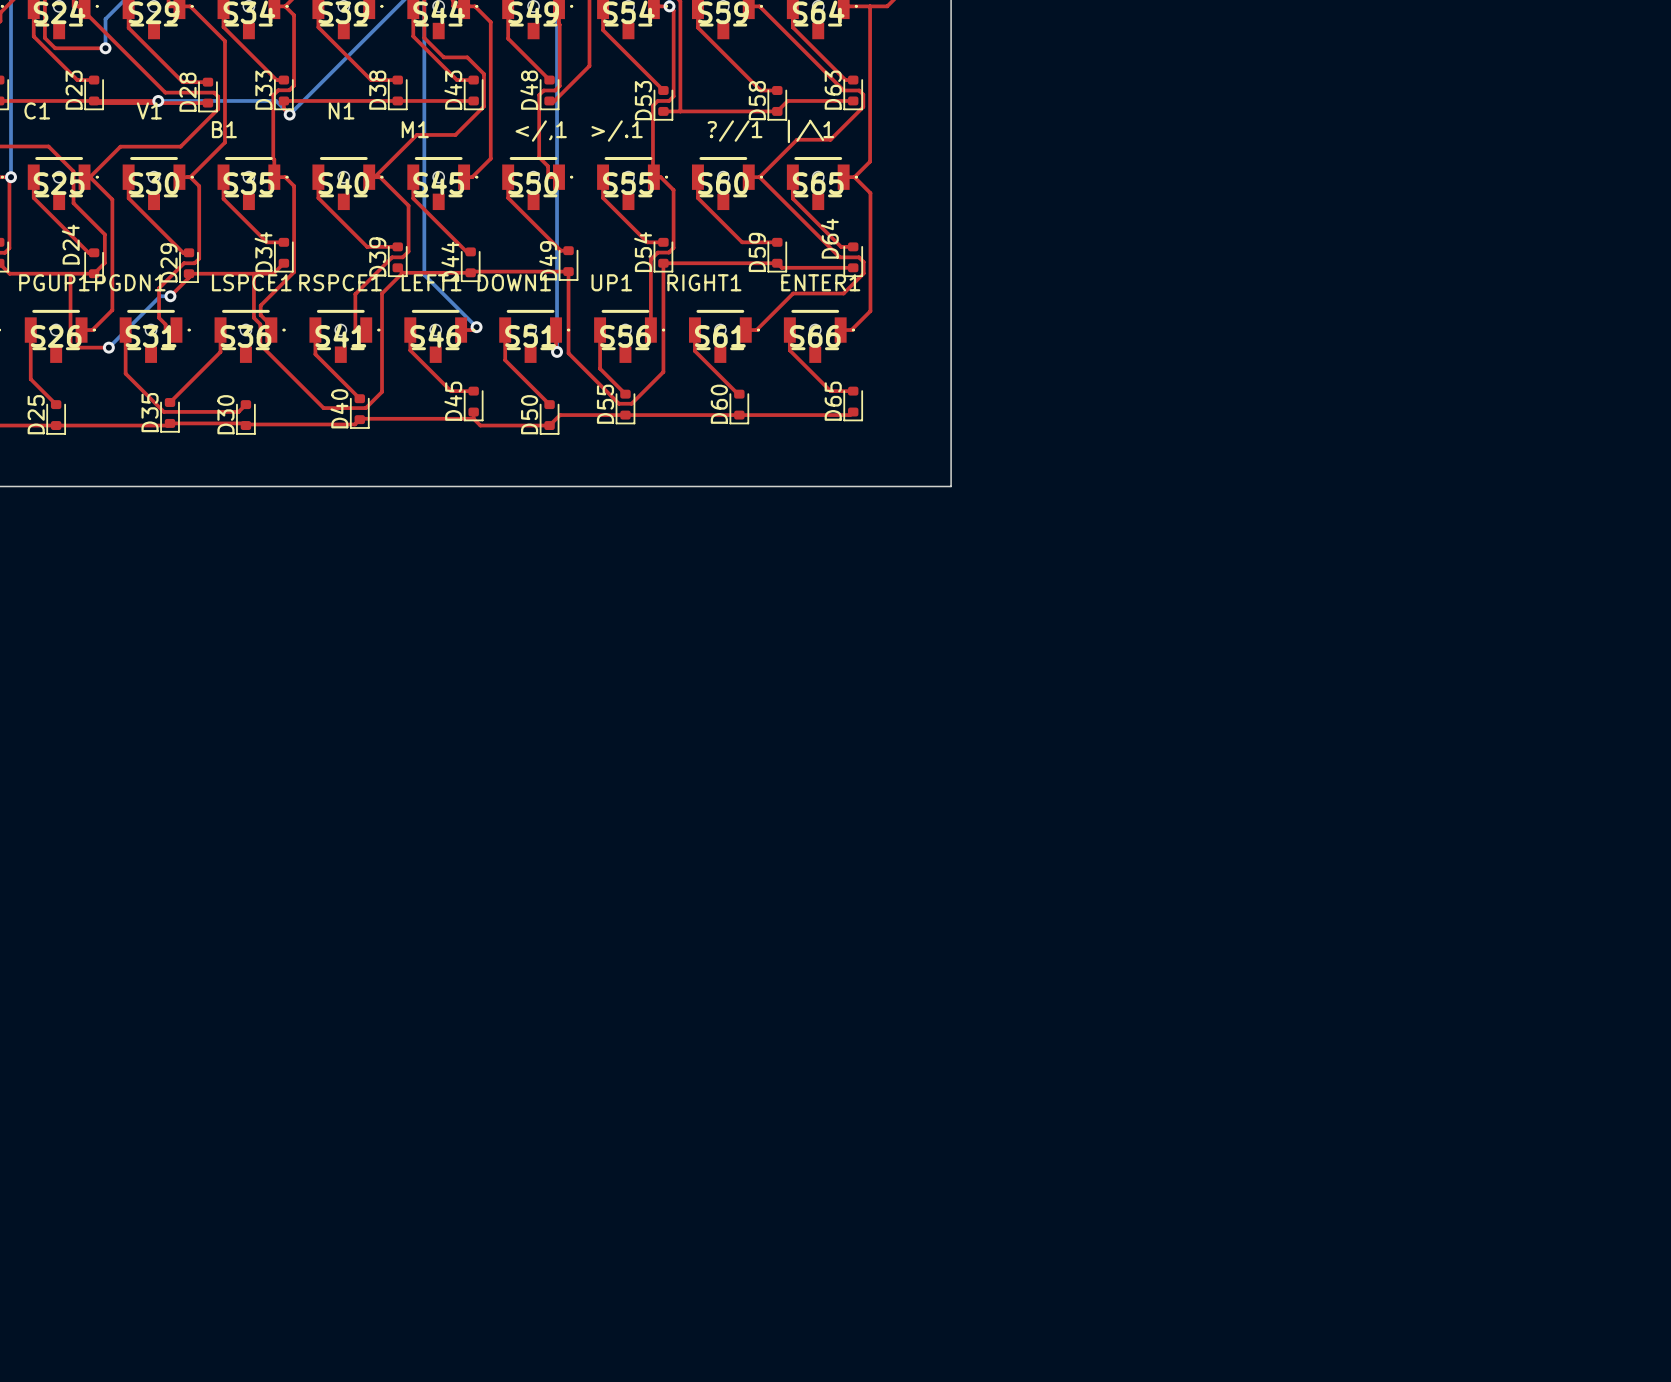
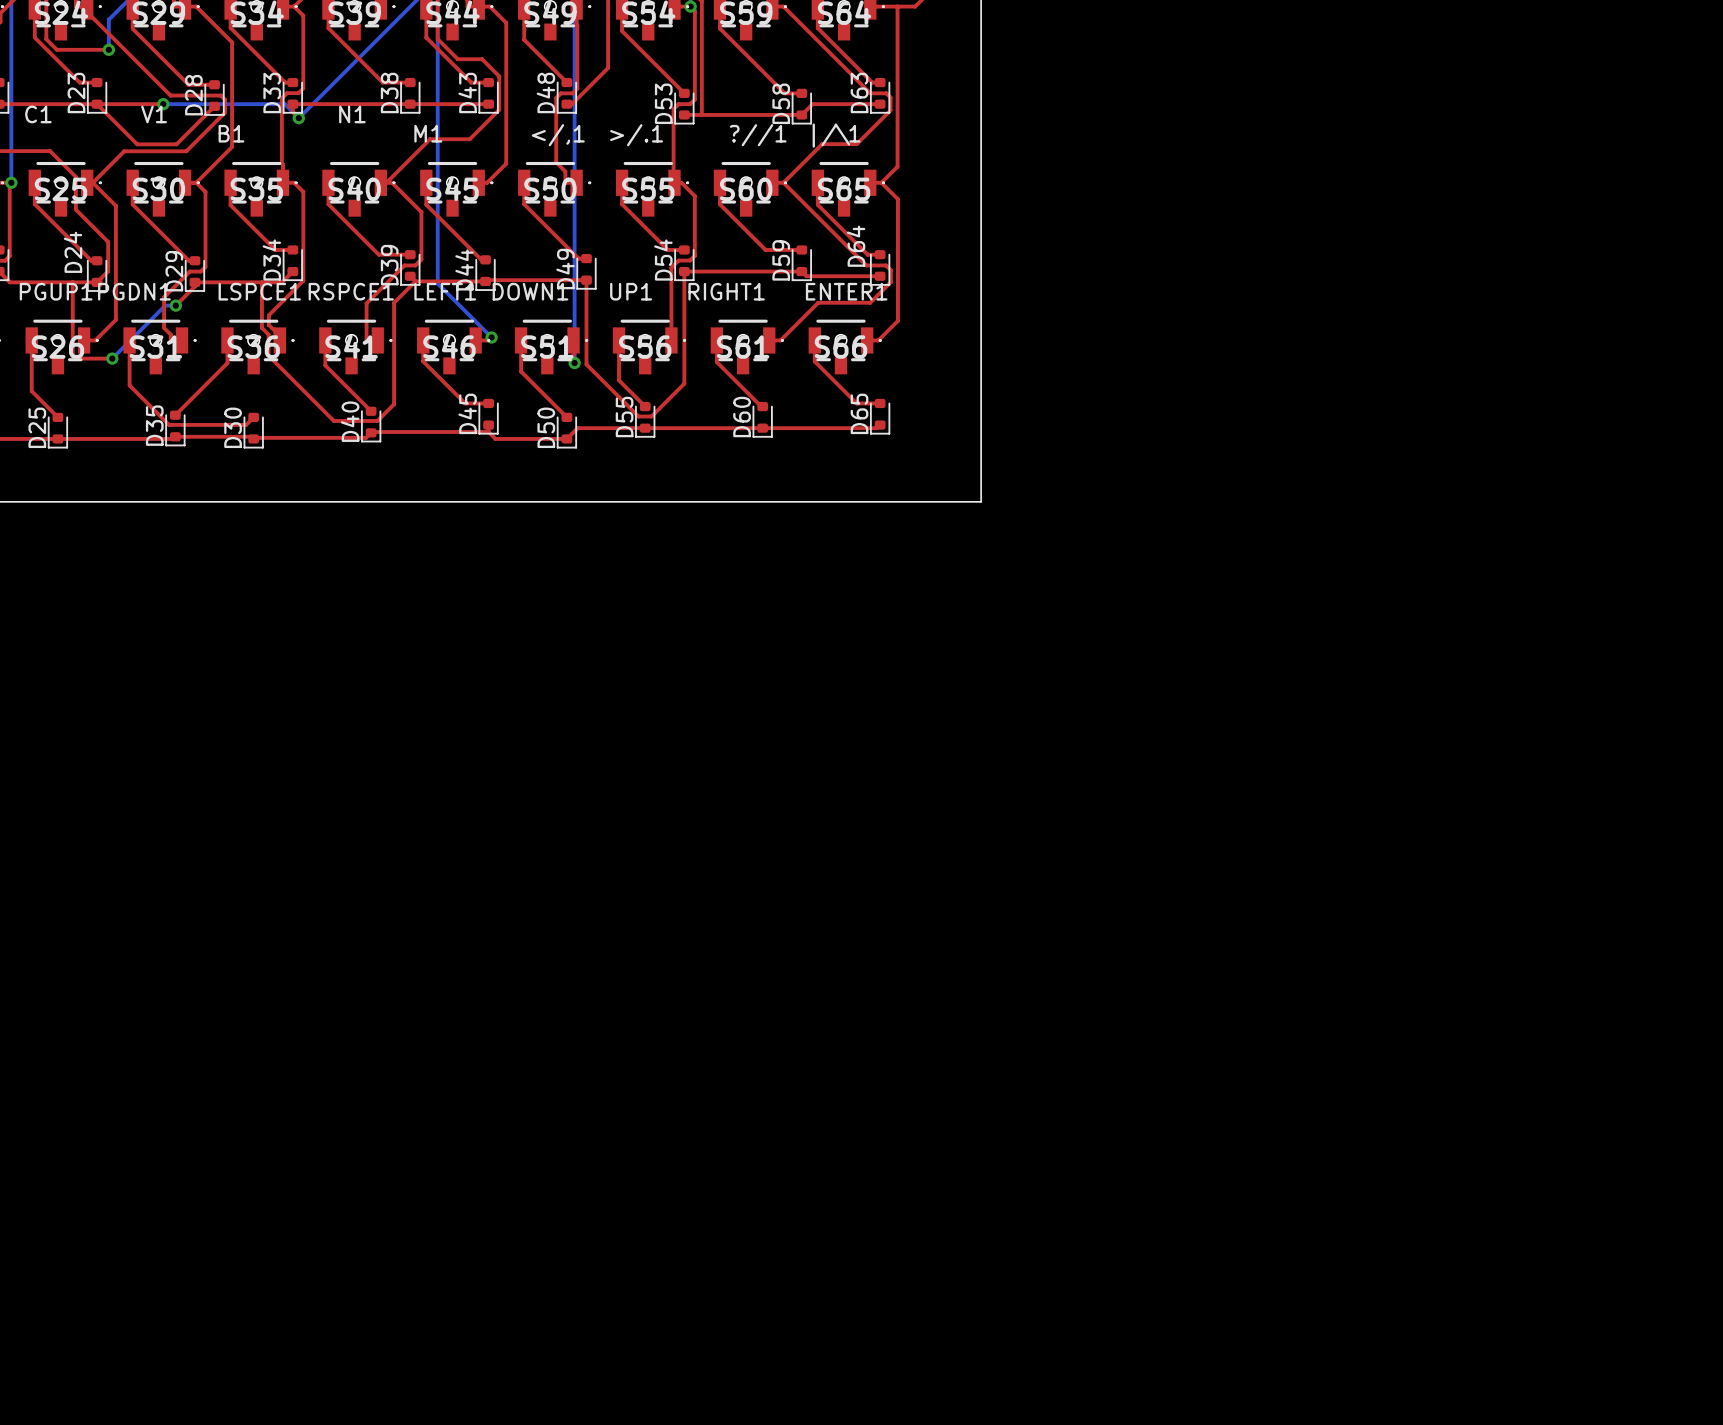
top track: (96, 103) (207, 103) -> (99, 106) (137, 144) (176, 144) (214, 106)

